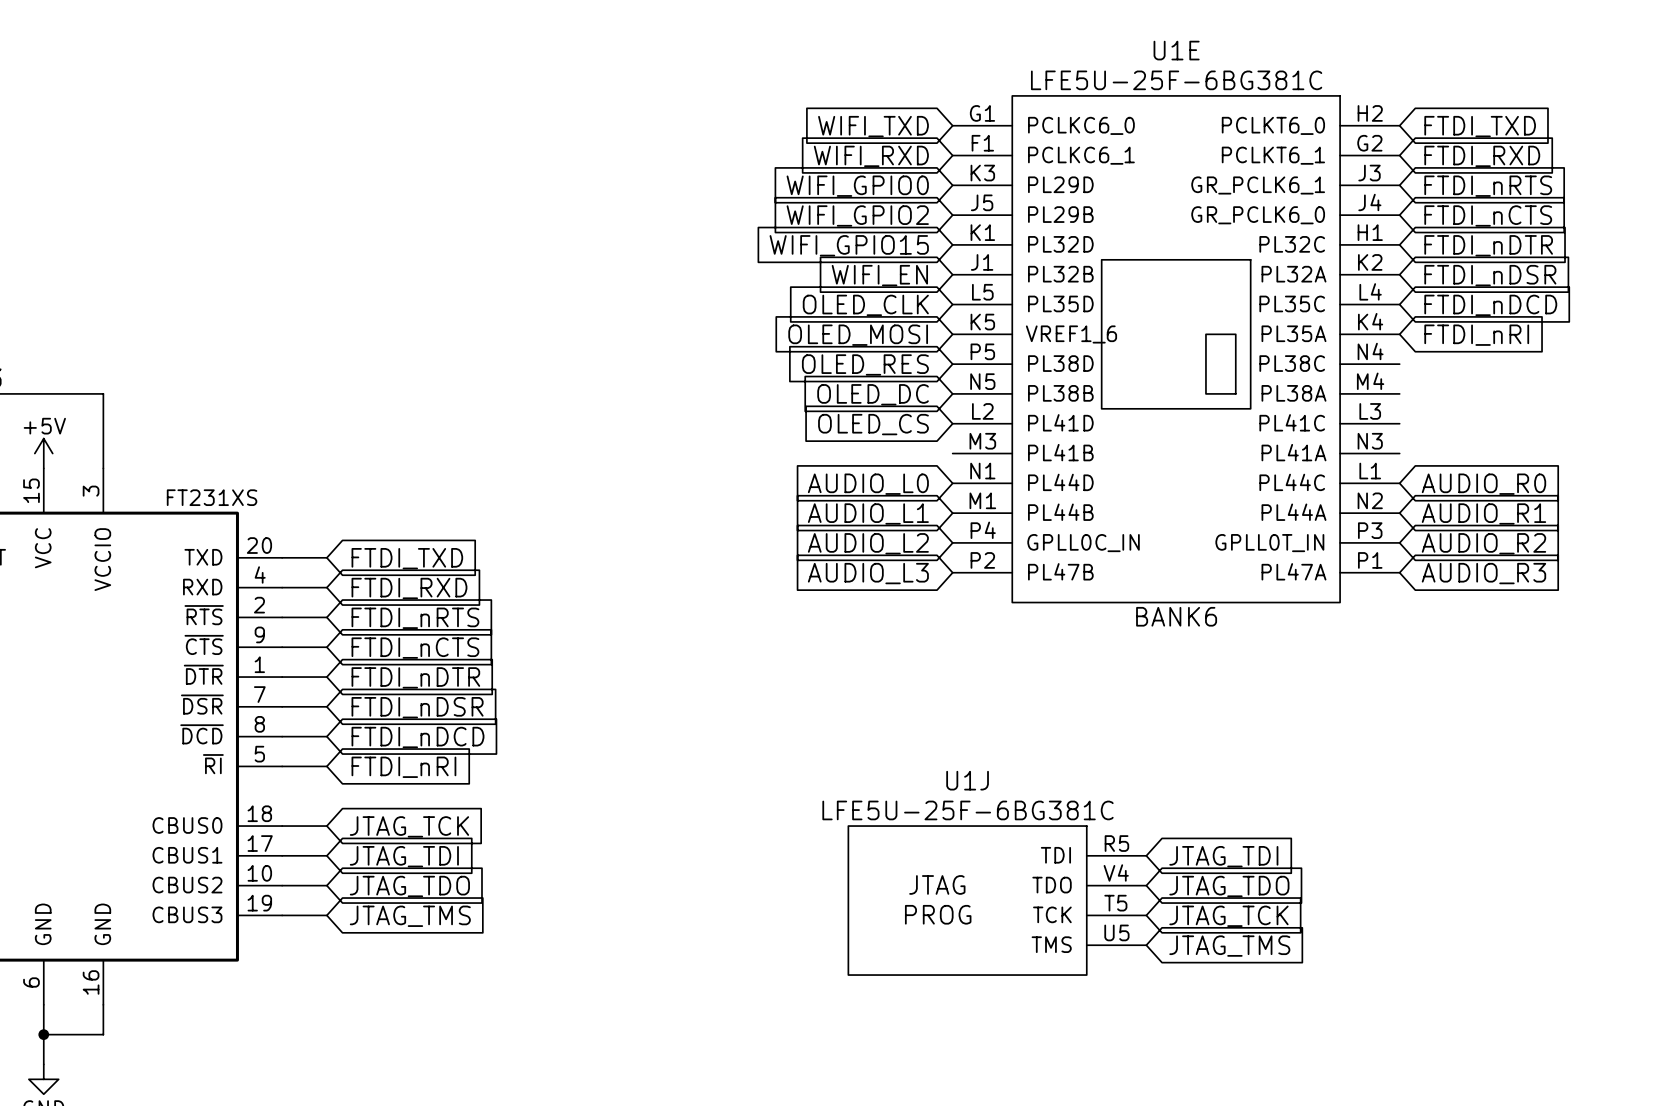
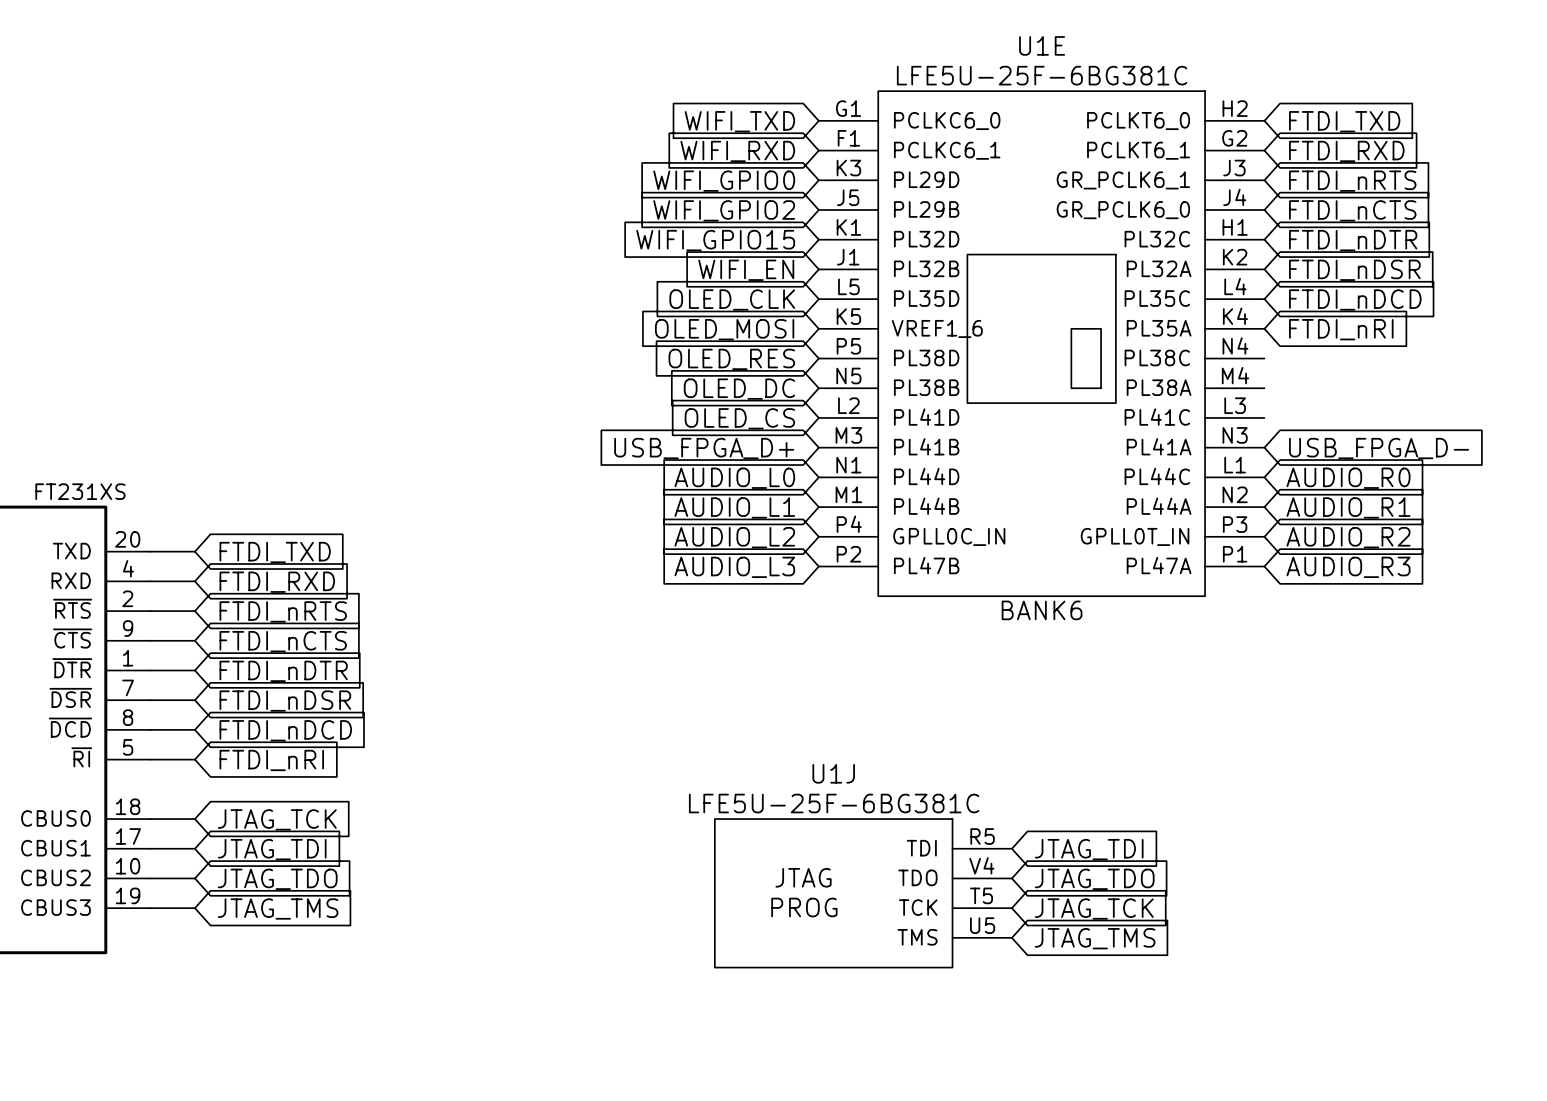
global label: none -> USB_FPGA_D+ (704, 448)
global label: none -> USB_FPGA_D- (1379, 448)

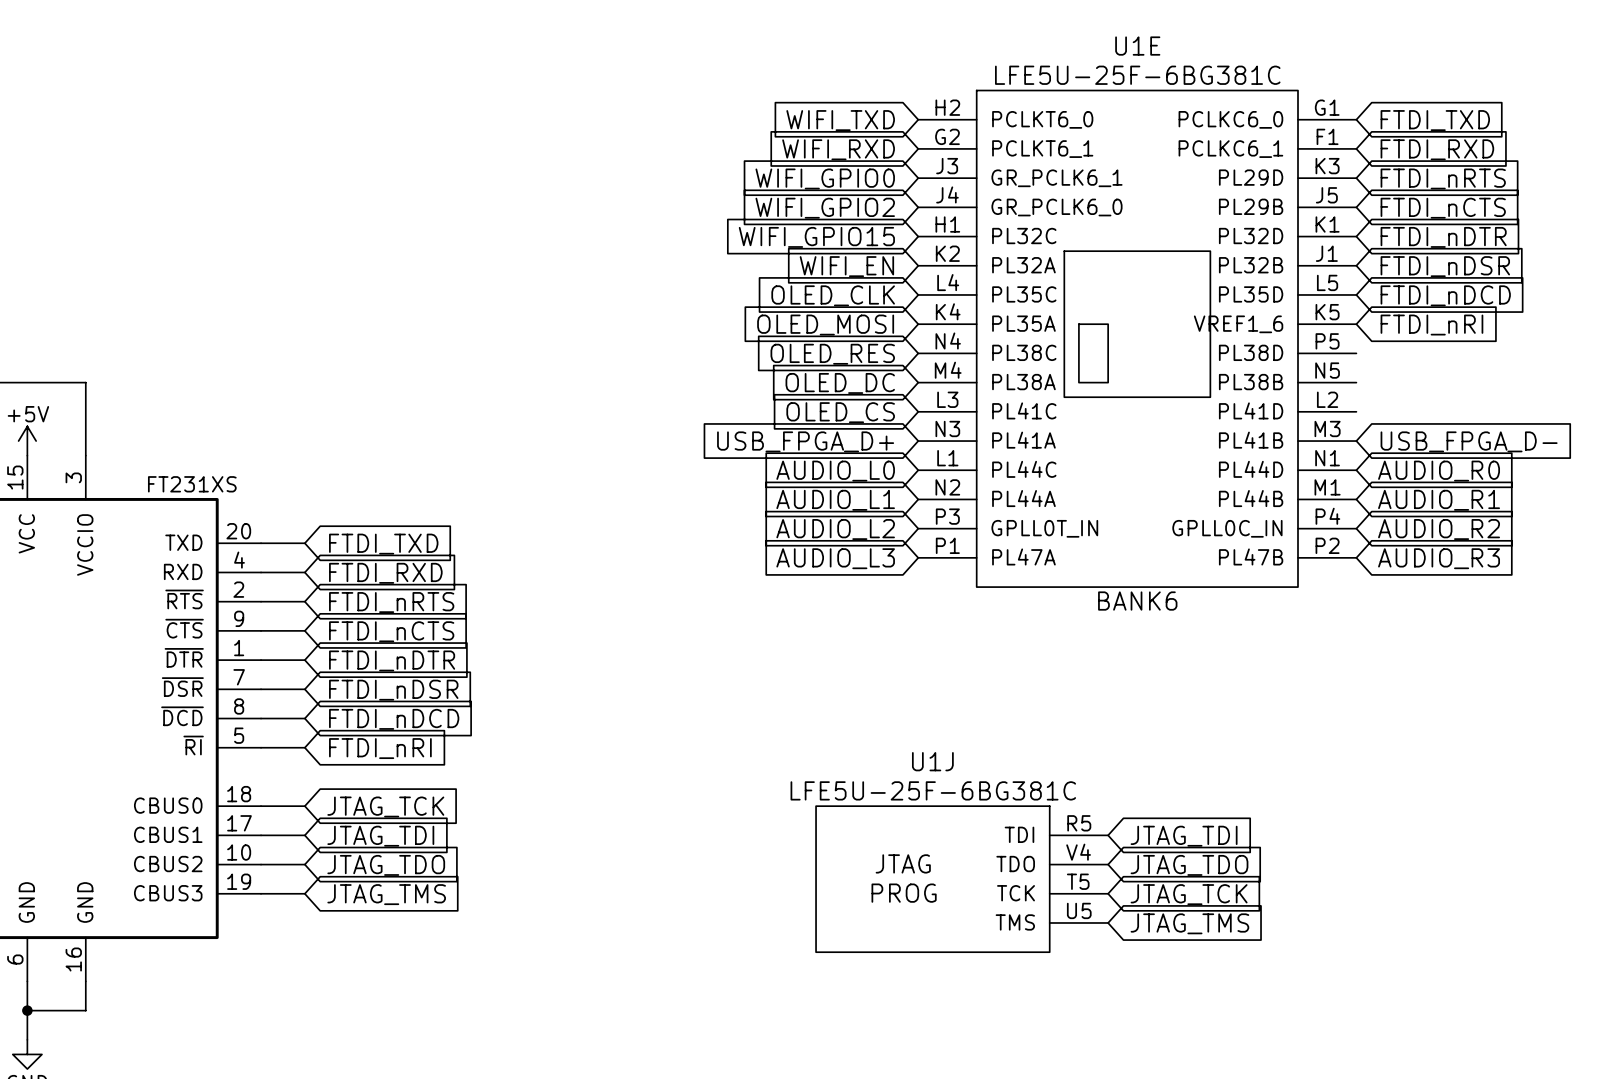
U1E flip: as is (1041, 343) -> left-right (1137, 338)

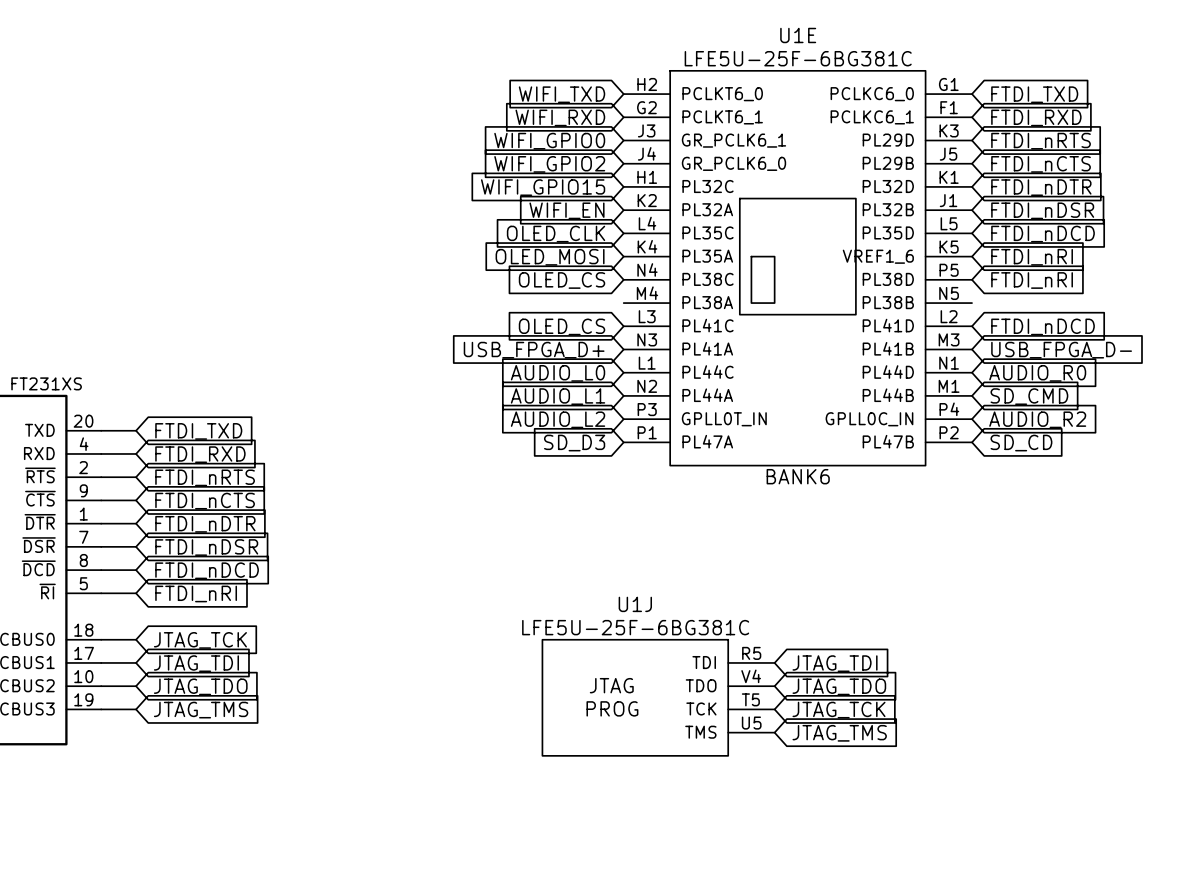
global label: OLED_RES (832, 354) -> OLED_CS (562, 280)
global label: none -> FTDI_nRI (1032, 280)
global label: OLED_DC (840, 383) -> none
global label: none -> FTDI_nDCD (1043, 326)
global label: AUDIO_R1 (1439, 500) -> SD_CMD (1029, 396)
global label: AUDIO_L3 (835, 558) -> SD_D3 (574, 443)
global label: AUDIO_R3 (1439, 558) -> SD_CD (1021, 443)

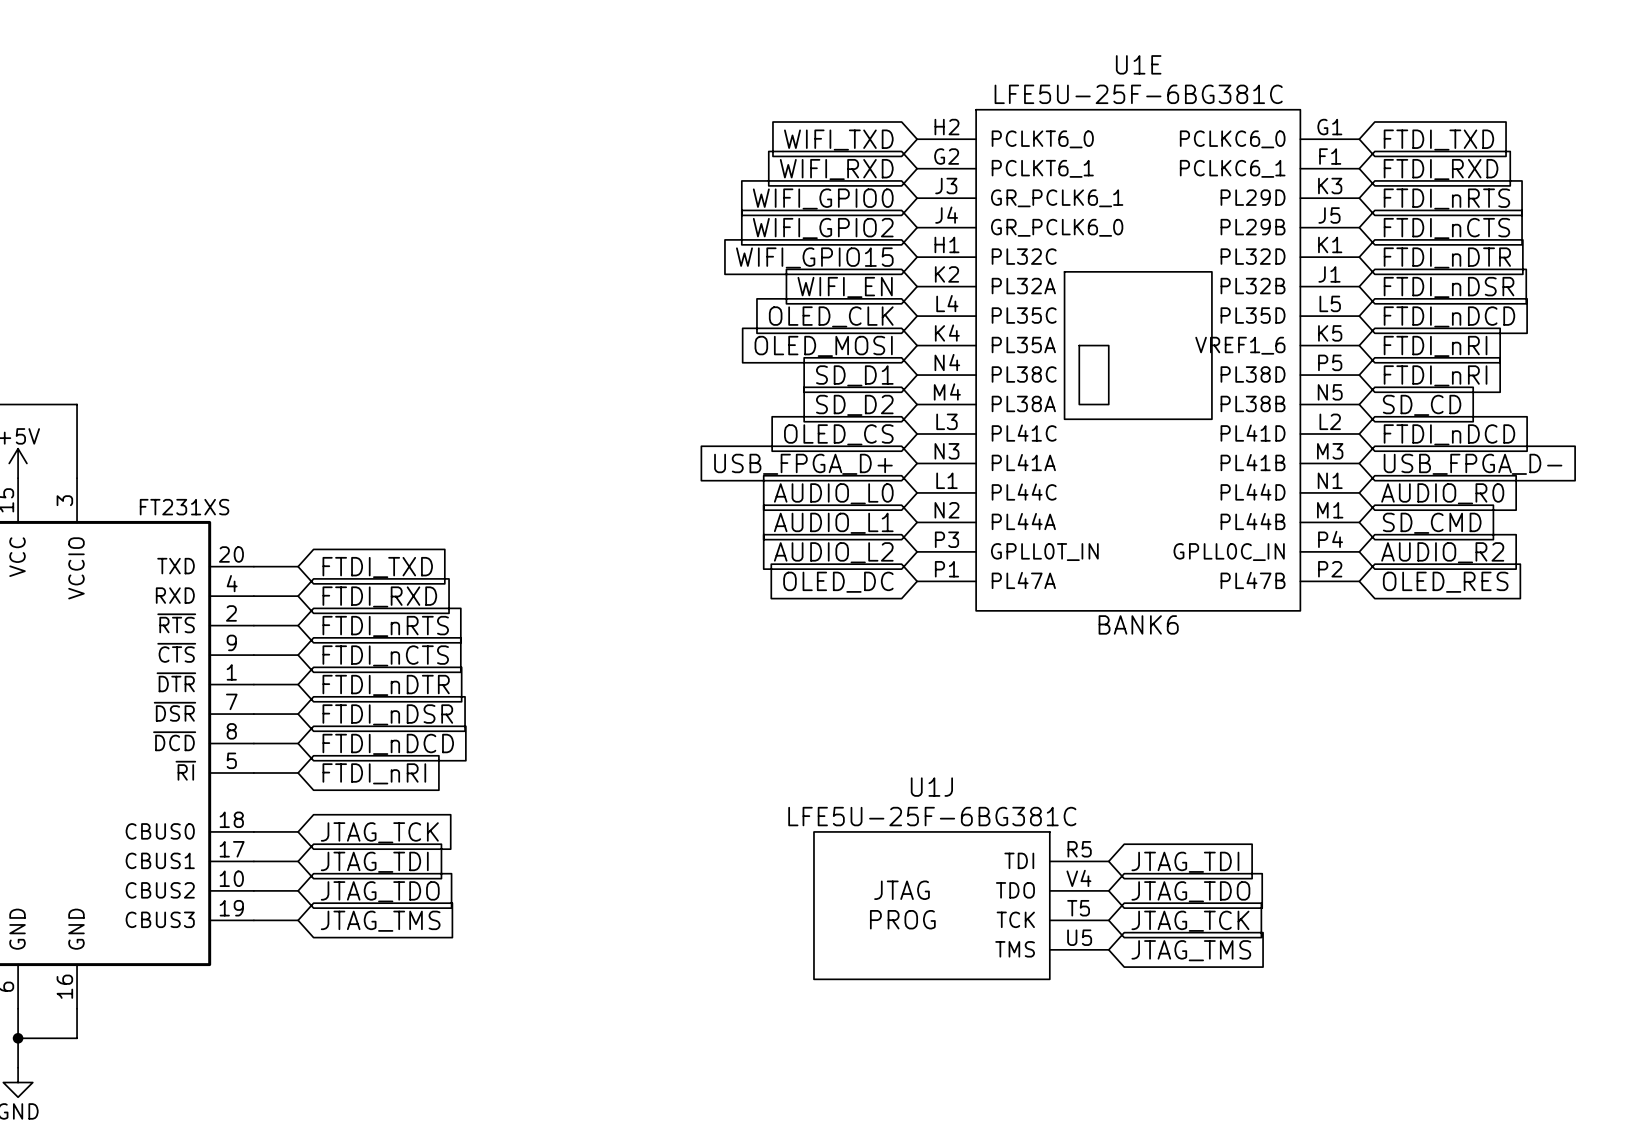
global label: OLED_CS (562, 280) -> SD_D1 (854, 375)
global label: none -> SD_D2 (854, 405)
global label: none -> SD_CD (1422, 405)
global label: SD_D3 (574, 443) -> OLED_DC (838, 582)
global label: SD_CD (1021, 443) -> OLED_RES (1445, 582)

